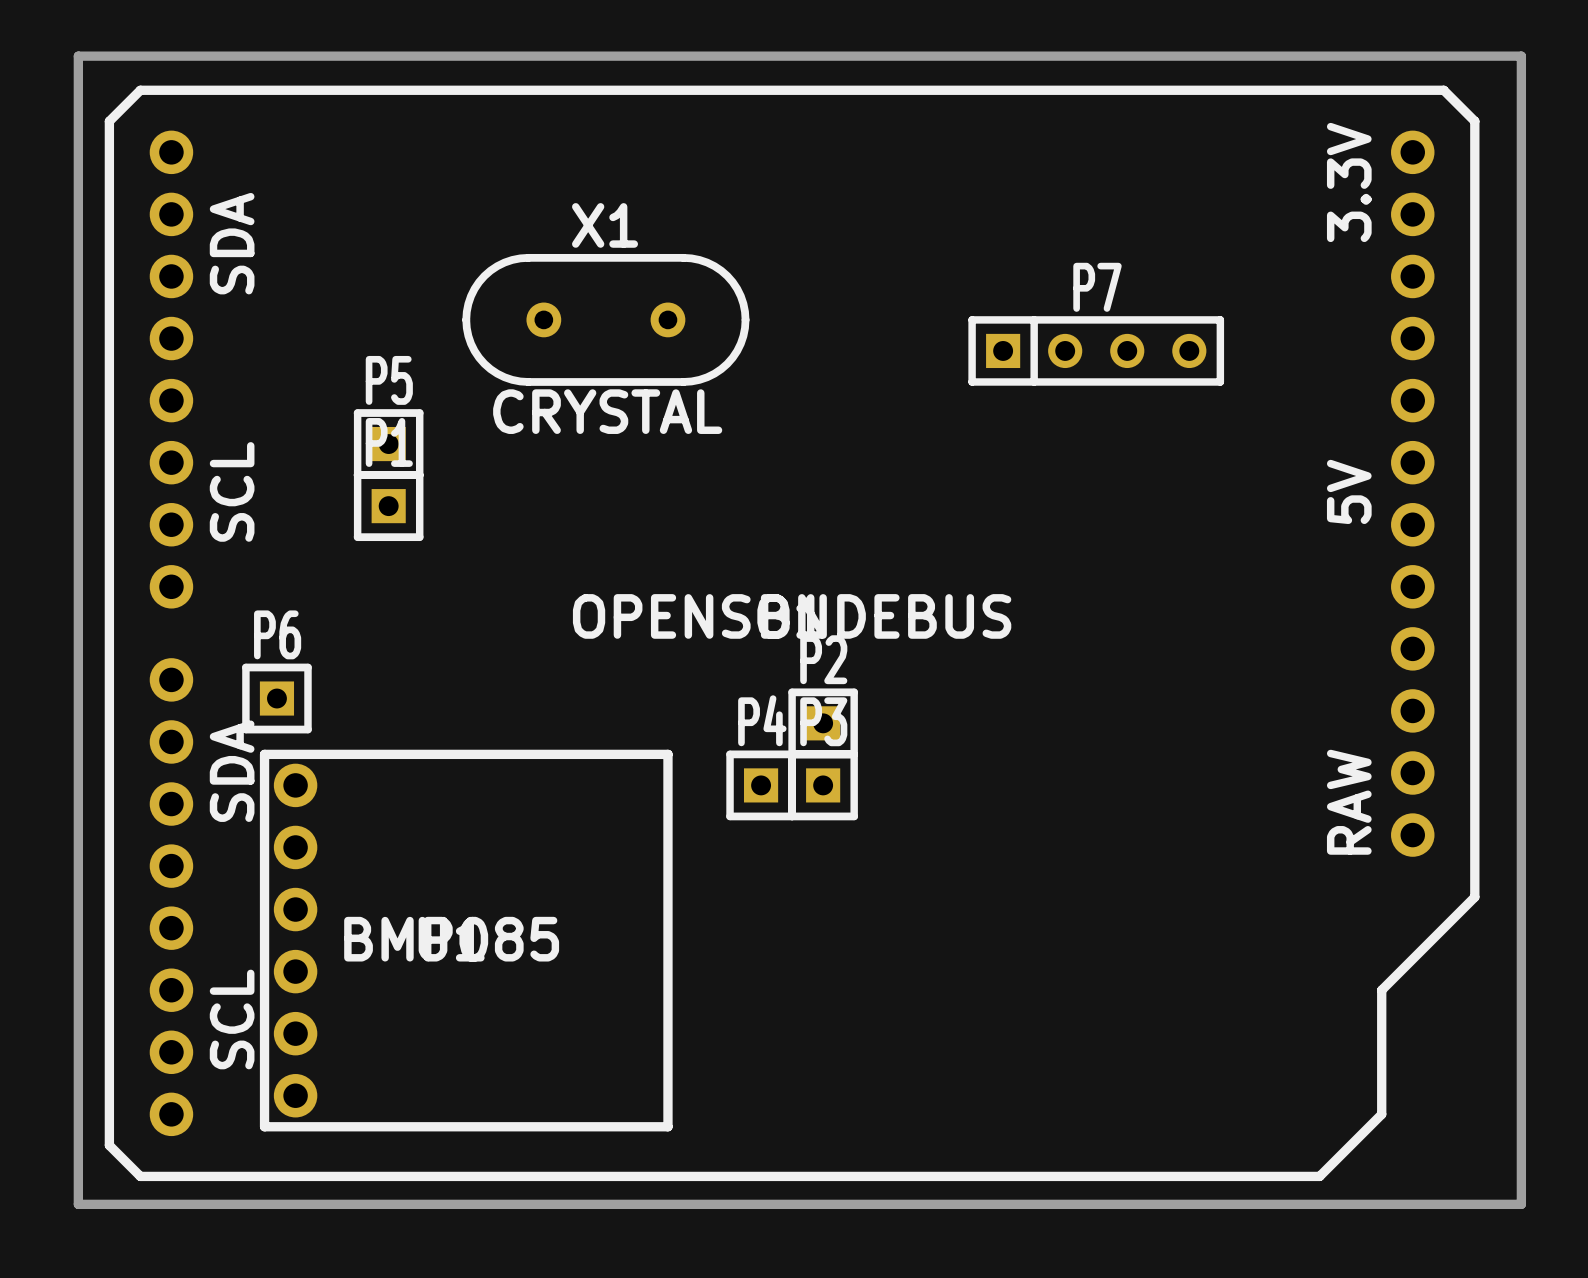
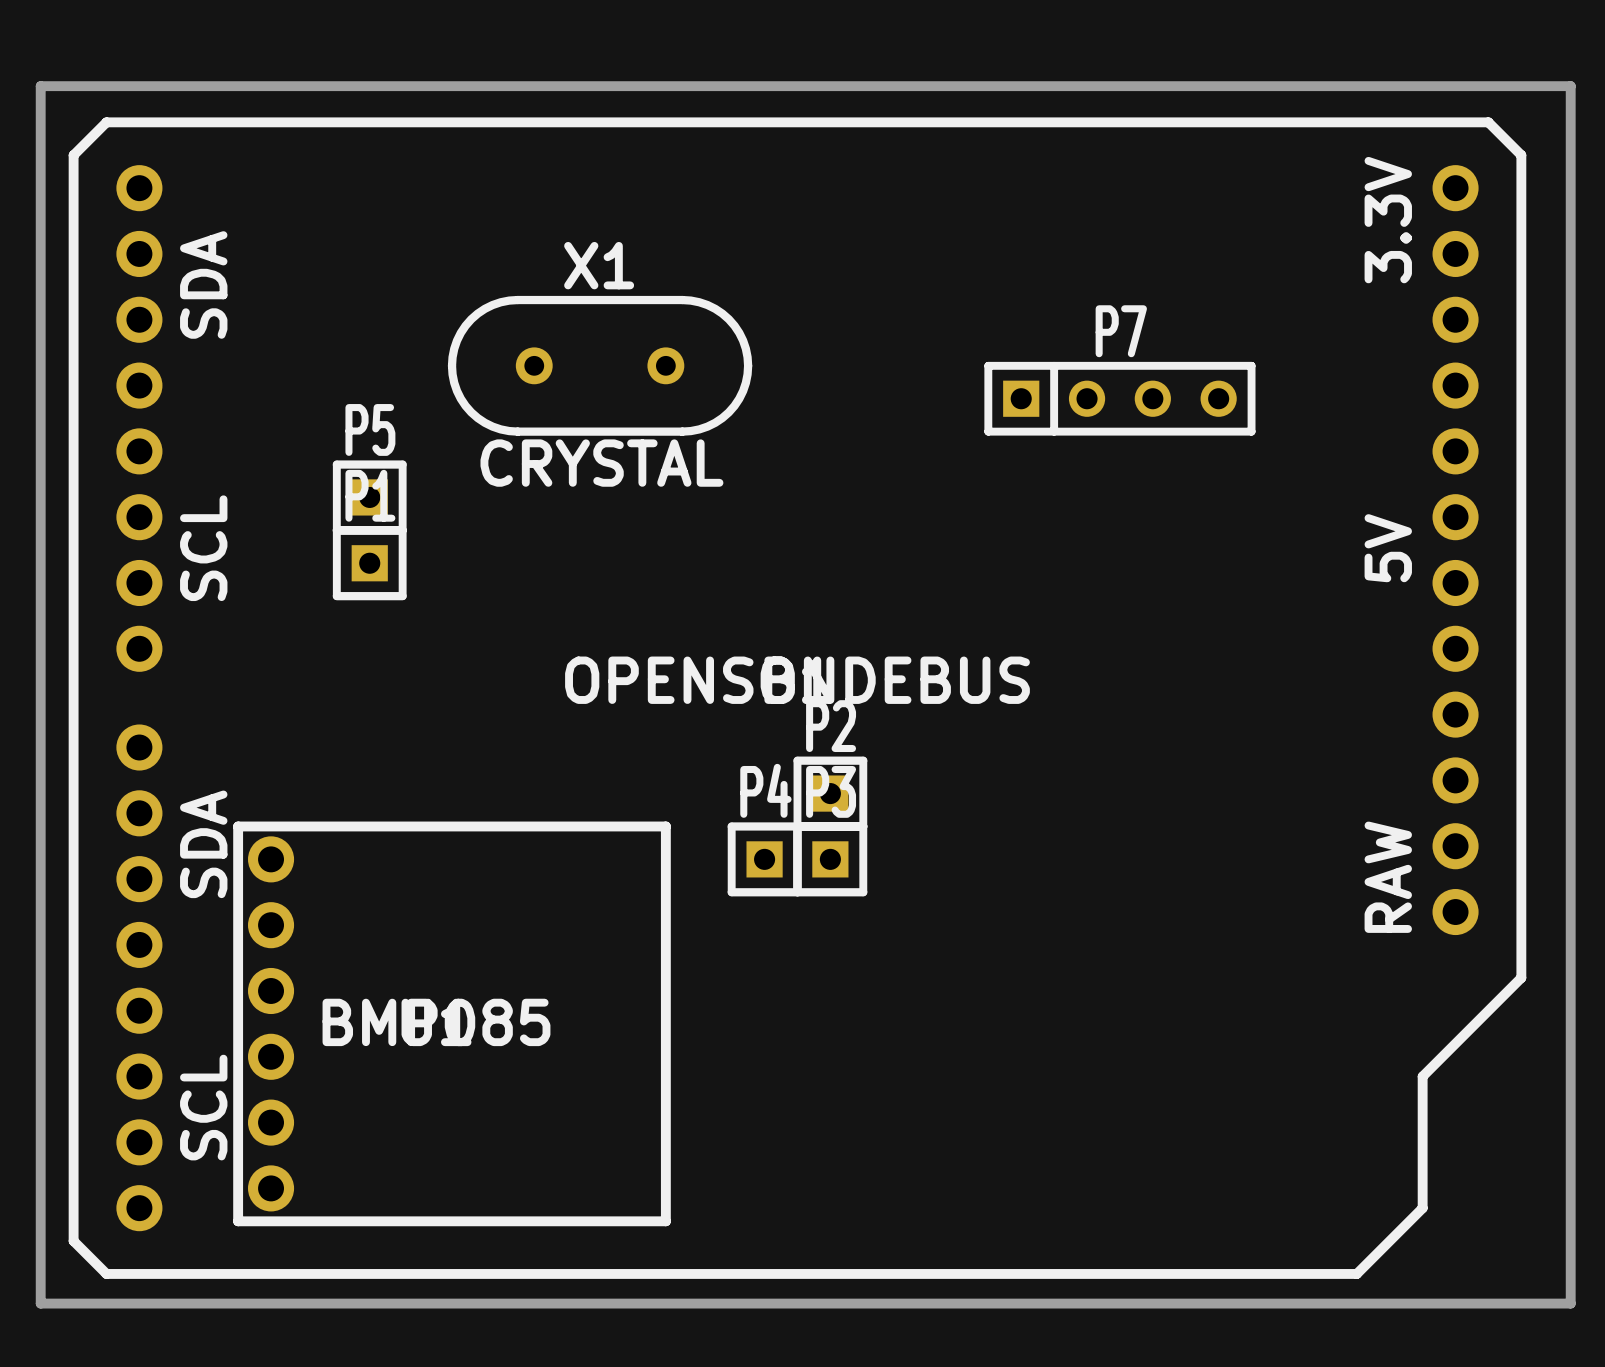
P6: (276, 698) -> none

